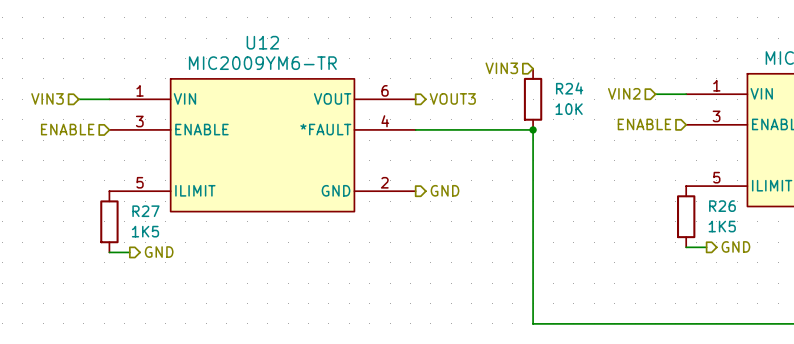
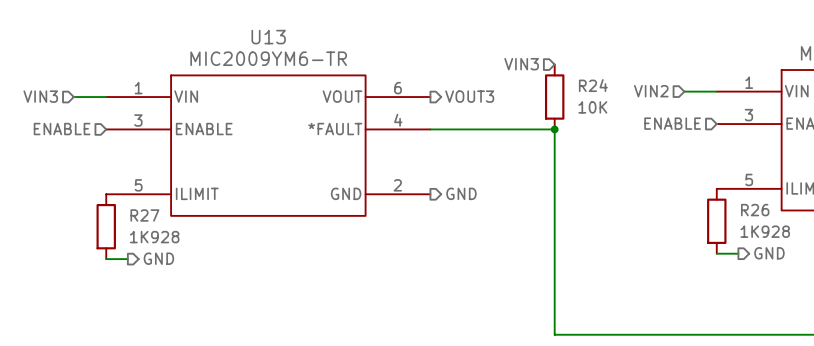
U12 name: U12 (262, 42) -> U13 (268, 37)
R26 value: 1K5 (722, 226) -> 1K928 (765, 231)
R27 value: 1K5 (145, 231) -> 1K928 (154, 237)

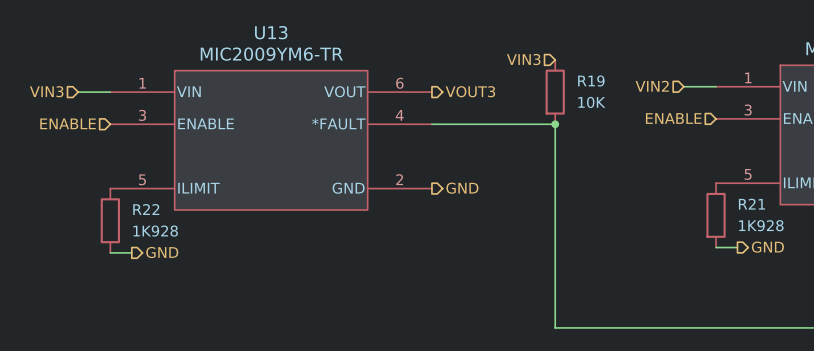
R24 name: R24 (593, 85) -> R19 (591, 80)
R26 name: R26 (755, 210) -> R21 (751, 204)
R27 name: R27 (144, 215) -> R22 (146, 209)

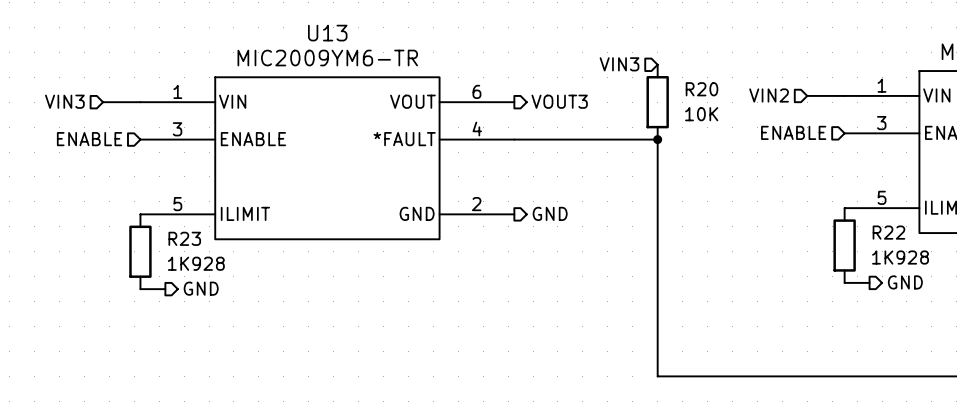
R19 name: R19 (591, 80) -> R20 (701, 89)
R21 name: R21 (751, 204) -> R22 (888, 232)
R22 name: R22 (146, 209) -> R23 (184, 238)

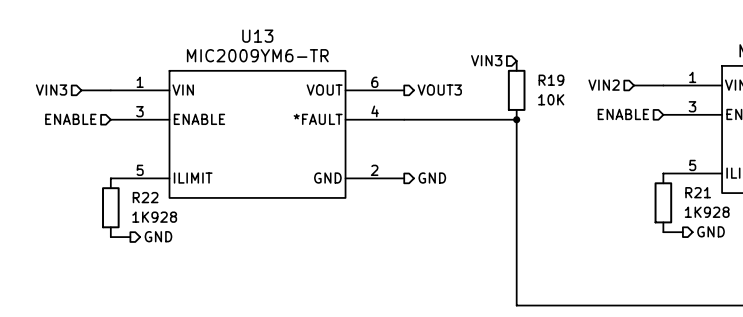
R20 name: R20 (701, 89) -> R19 (551, 80)
R22 name: R22 (888, 232) -> R21 (698, 192)
R23 name: R23 (184, 238) -> R22 (145, 197)

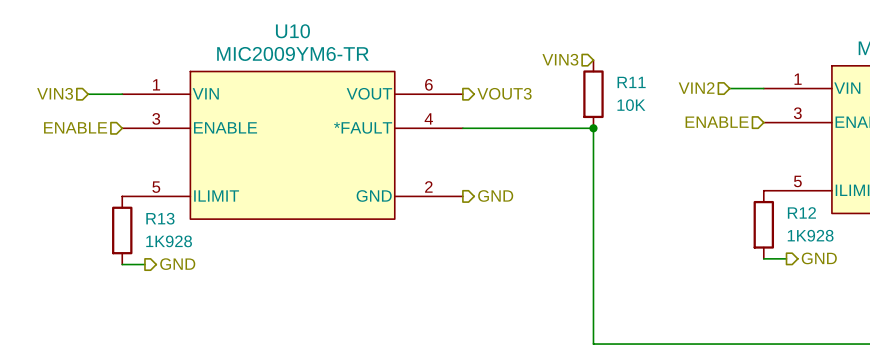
U13 name: U13 (257, 36) -> U10 (292, 31)
R19 name: R19 (551, 80) -> R11 (631, 82)
R21 name: R21 (698, 192) -> R12 (801, 212)
R22 name: R22 (145, 197) -> R13 (160, 218)

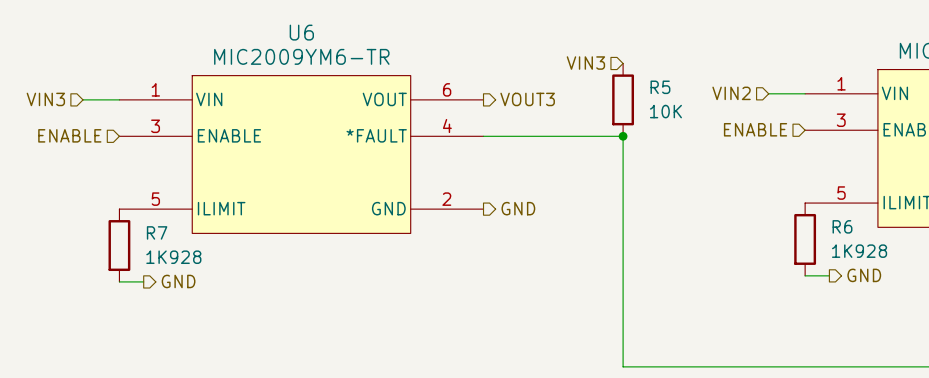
U10 name: U10 (292, 31) -> U6 (301, 32)
R11 name: R11 (631, 82) -> R5 (660, 87)
R12 name: R12 (801, 212) -> R6 (842, 226)
R13 name: R13 (160, 218) -> R7 (157, 232)

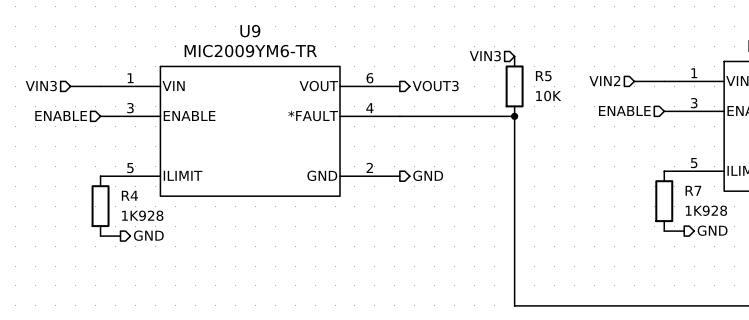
U6 name: U6 (301, 32) -> U9 (250, 31)
R6 name: R6 (842, 226) -> R7 (693, 190)
R7 name: R7 (157, 232) -> R4 (129, 195)

